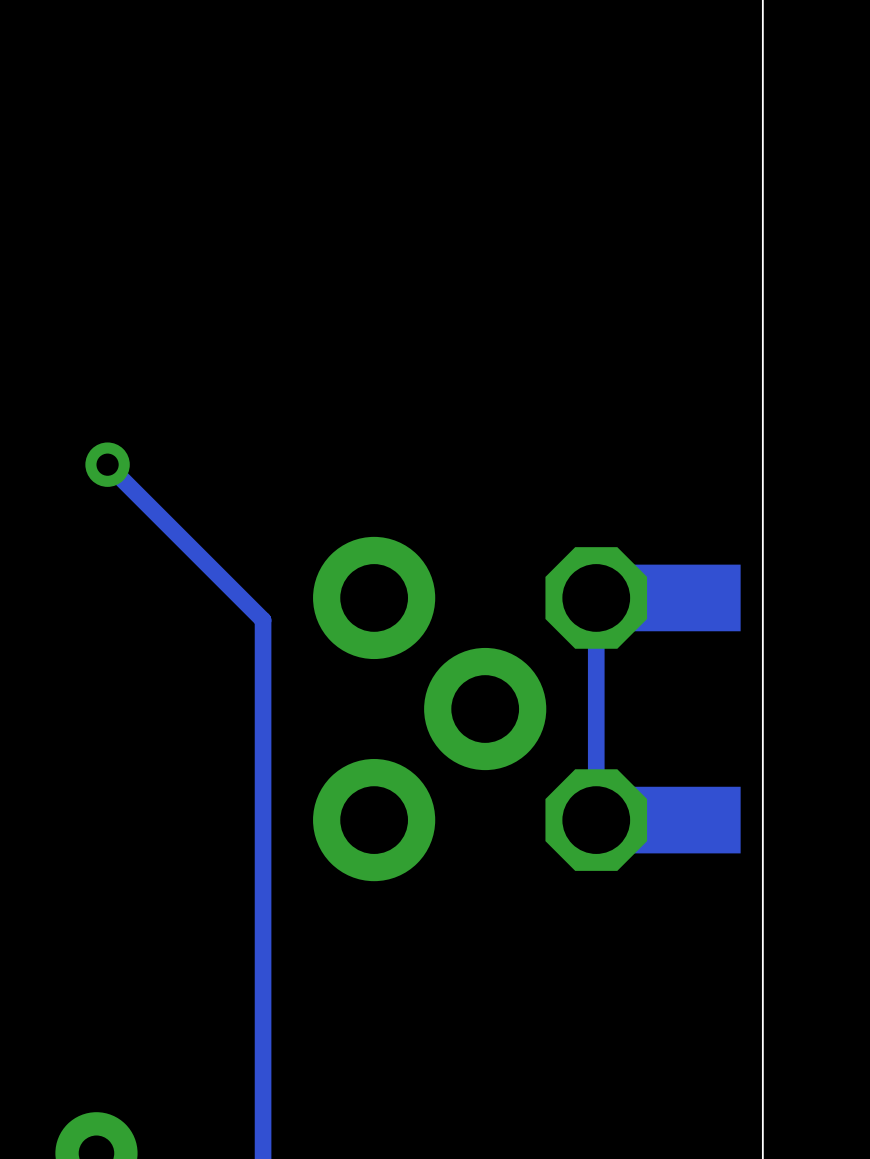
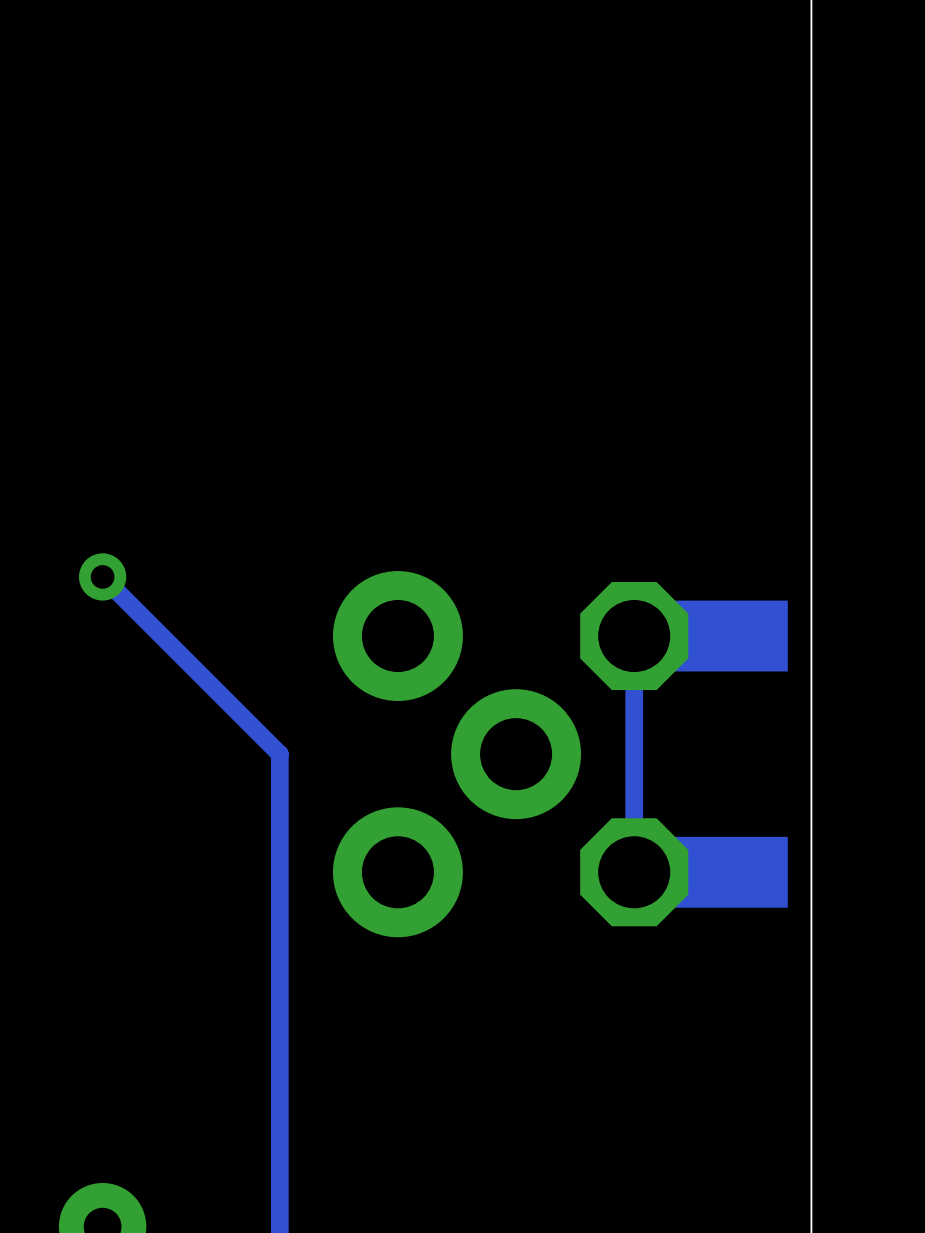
track: (107, 464) (263, 620) (263, 709) -> (102, 576) (279, 754)
via position: (107, 464) -> (102, 576)

